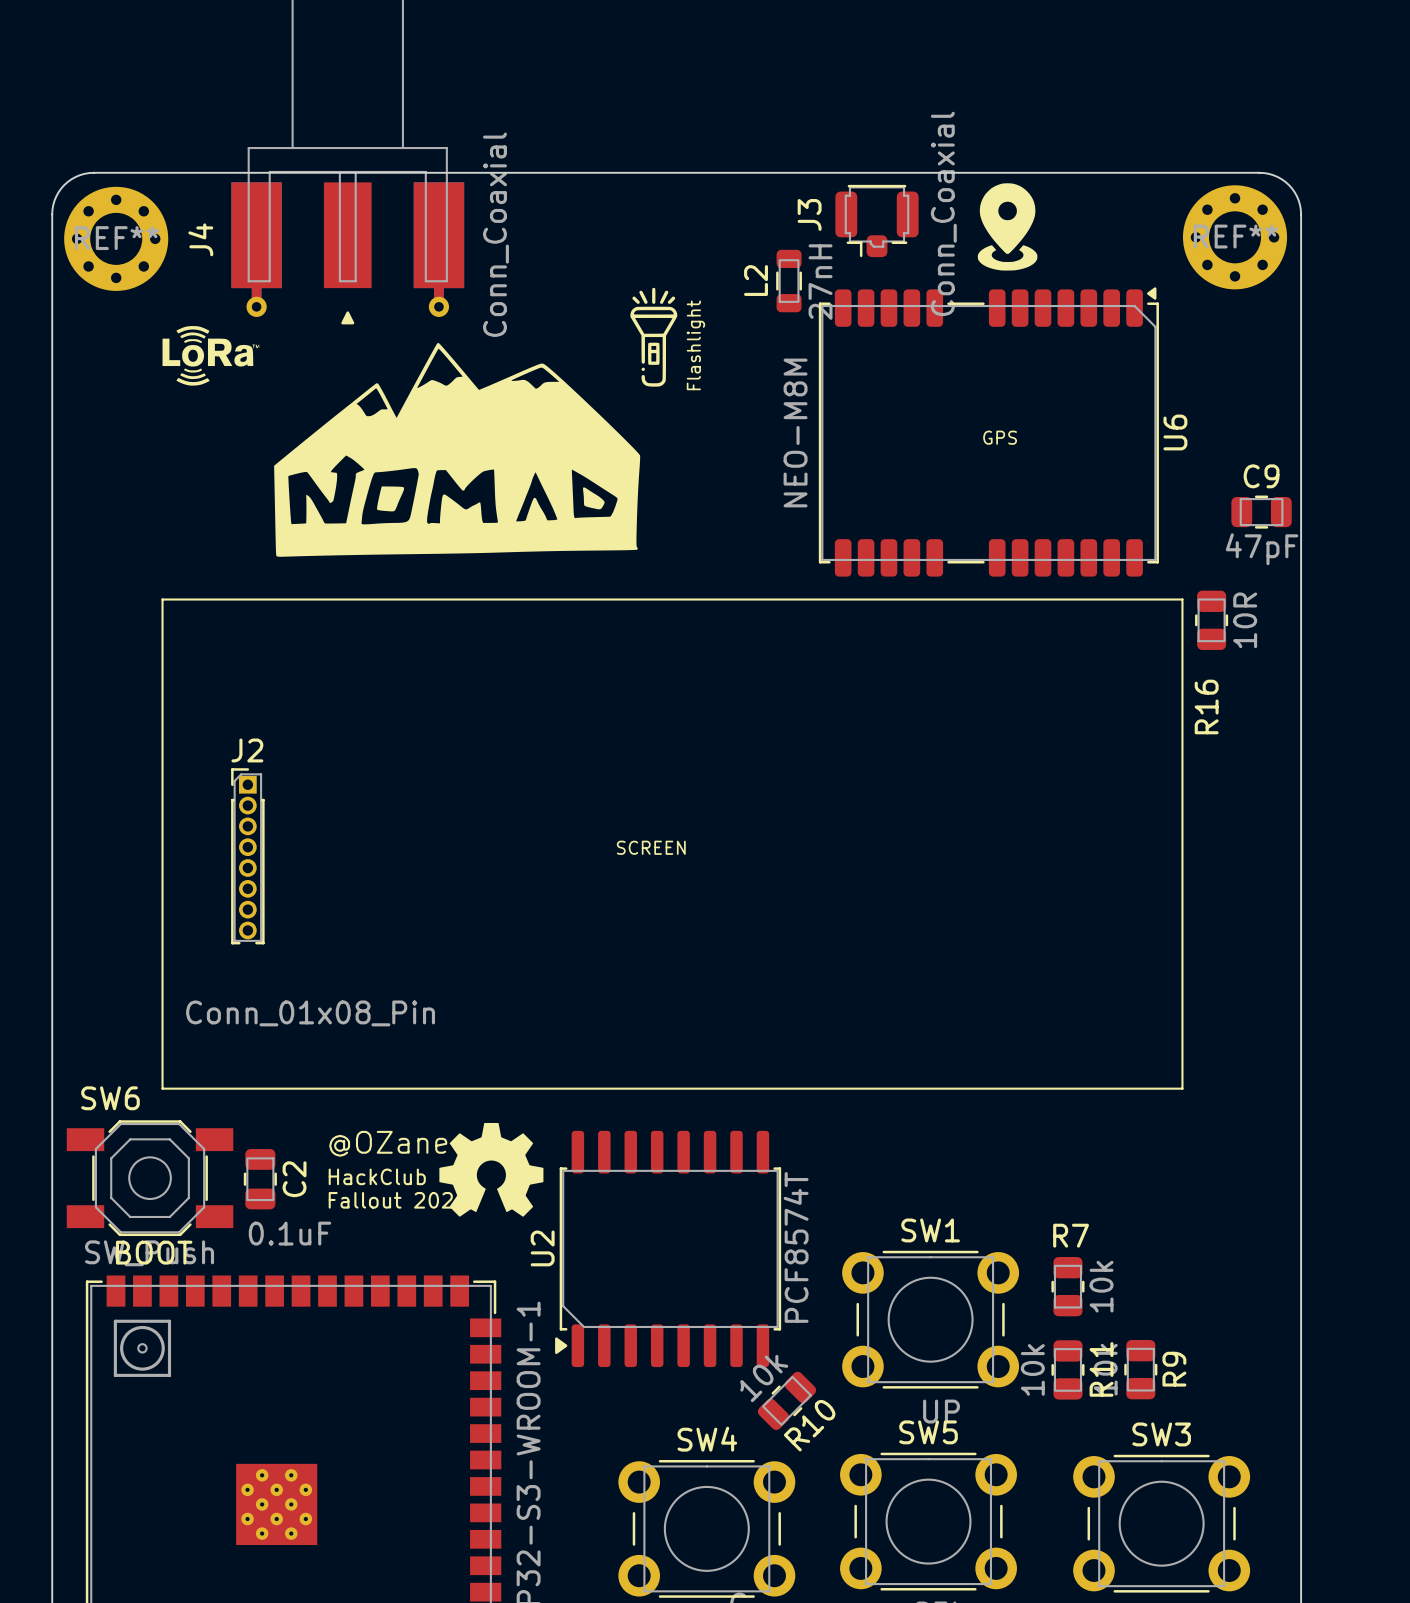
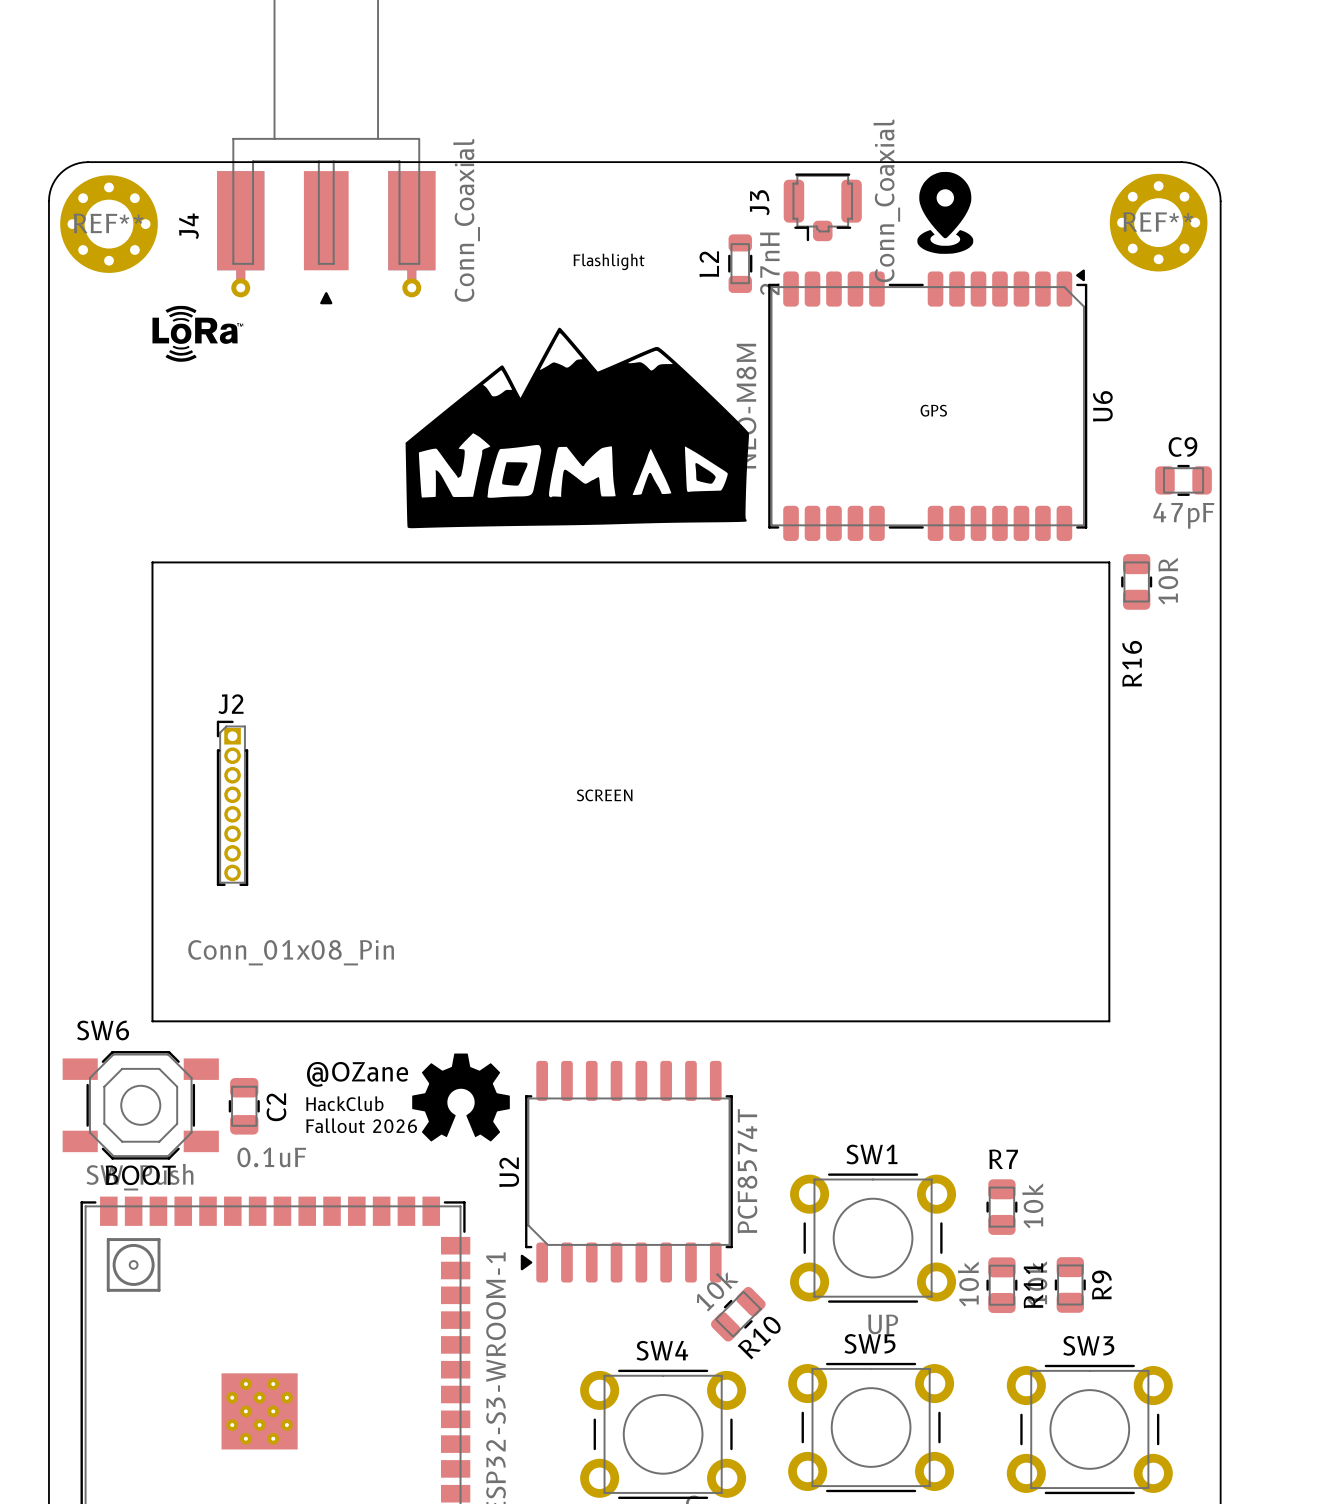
drawing: [630, 287, 678, 387] -> none
text rotation: 0° (695, 345) -> 90° clockwise (609, 261)
drawing position: (457, 449) -> (577, 427)

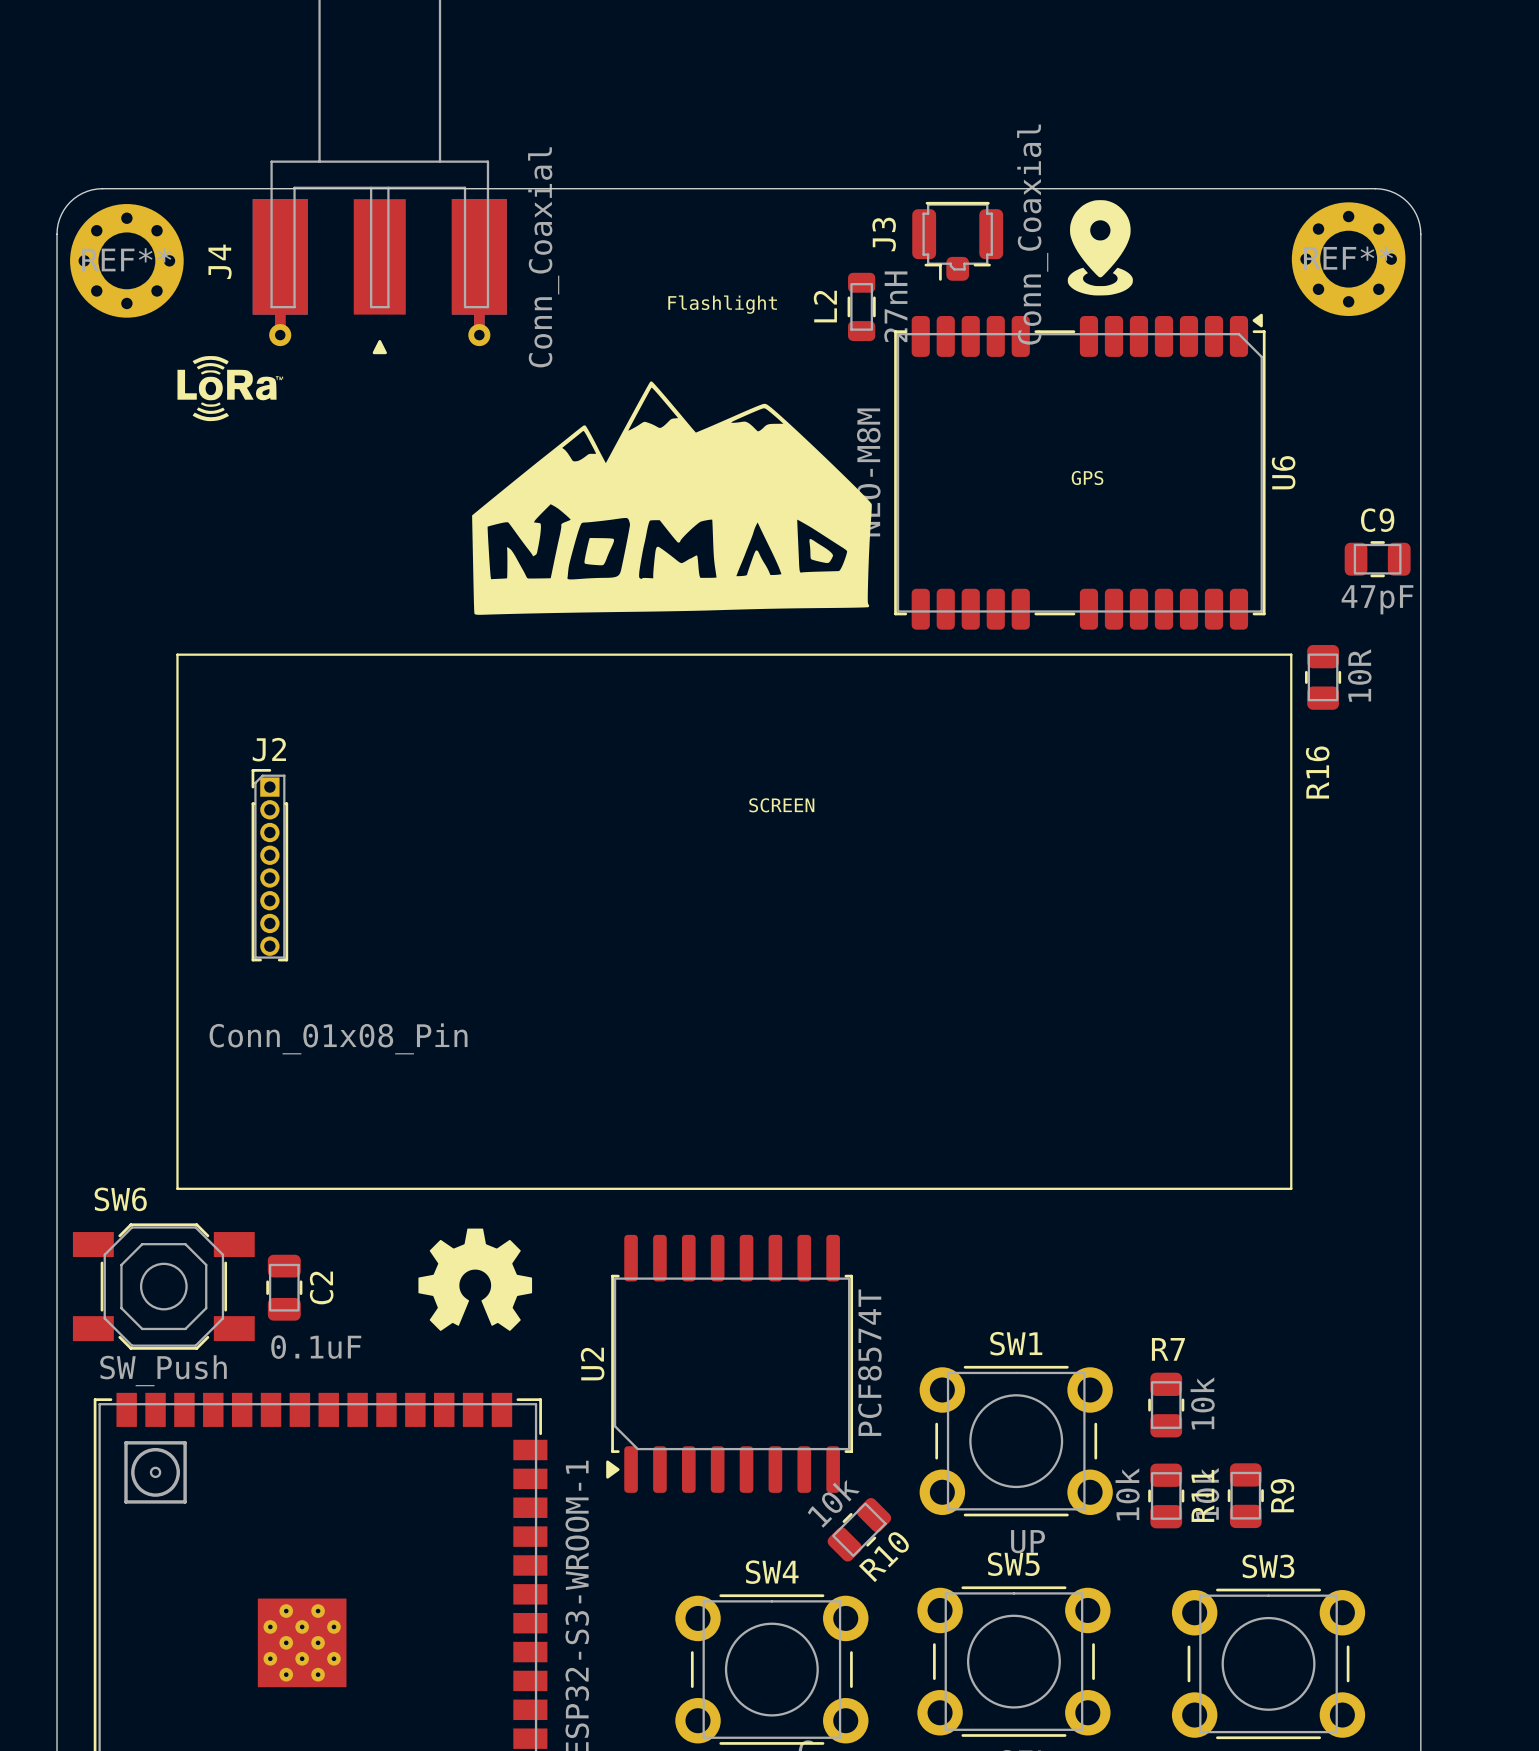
text position: SCREEN (604, 795) -> SCREEN (781, 805)
J2 position: (232, 803) -> (269, 865)
text: @OZane (357, 1074) -> none
drawing position: (461, 1097) -> (475, 1279)
text: HackClub (344, 1103) -> none
text: Fallout 2026 (361, 1125) -> none
text: BOOT (140, 1175) -> none

